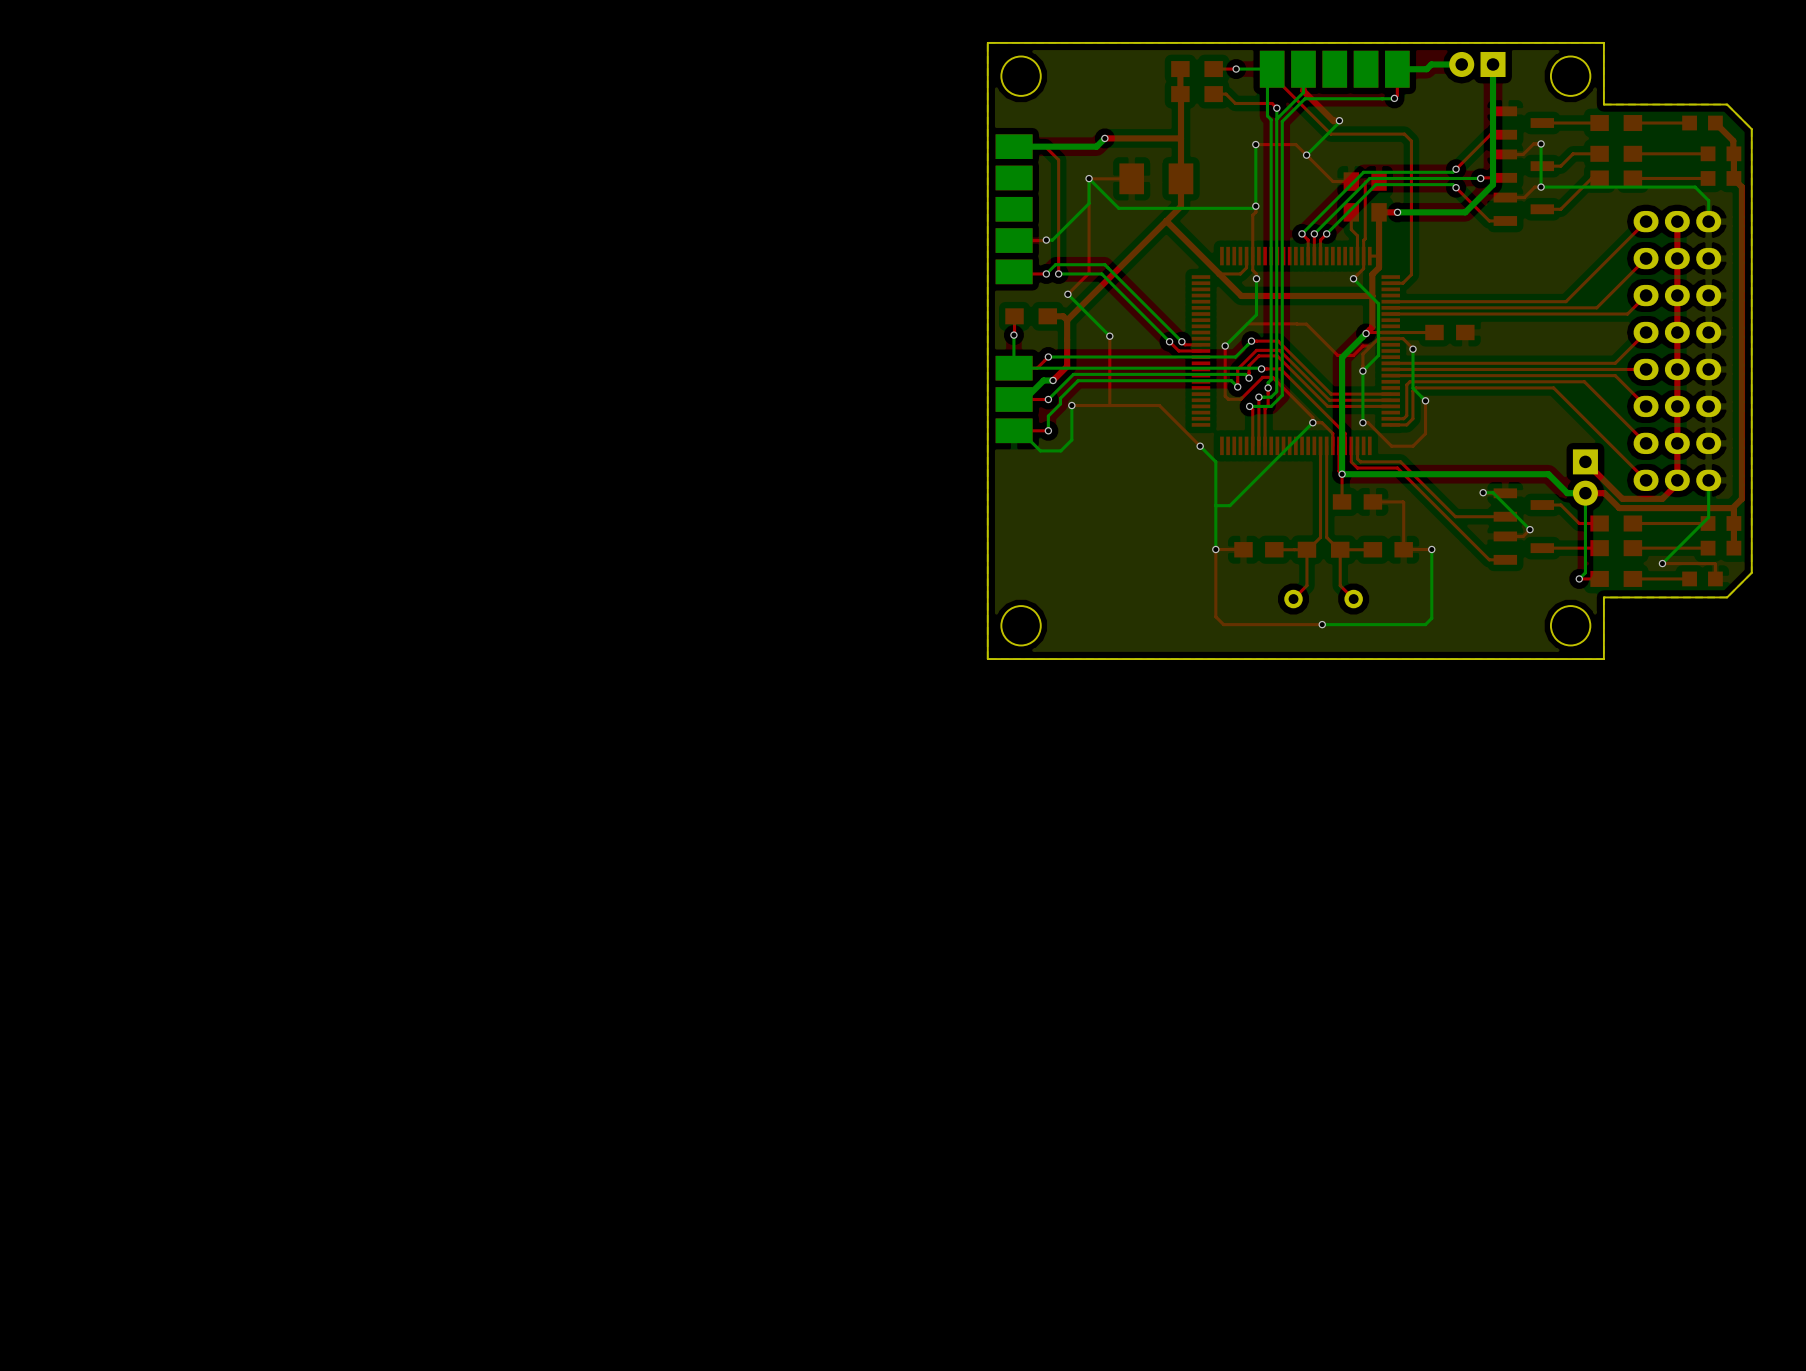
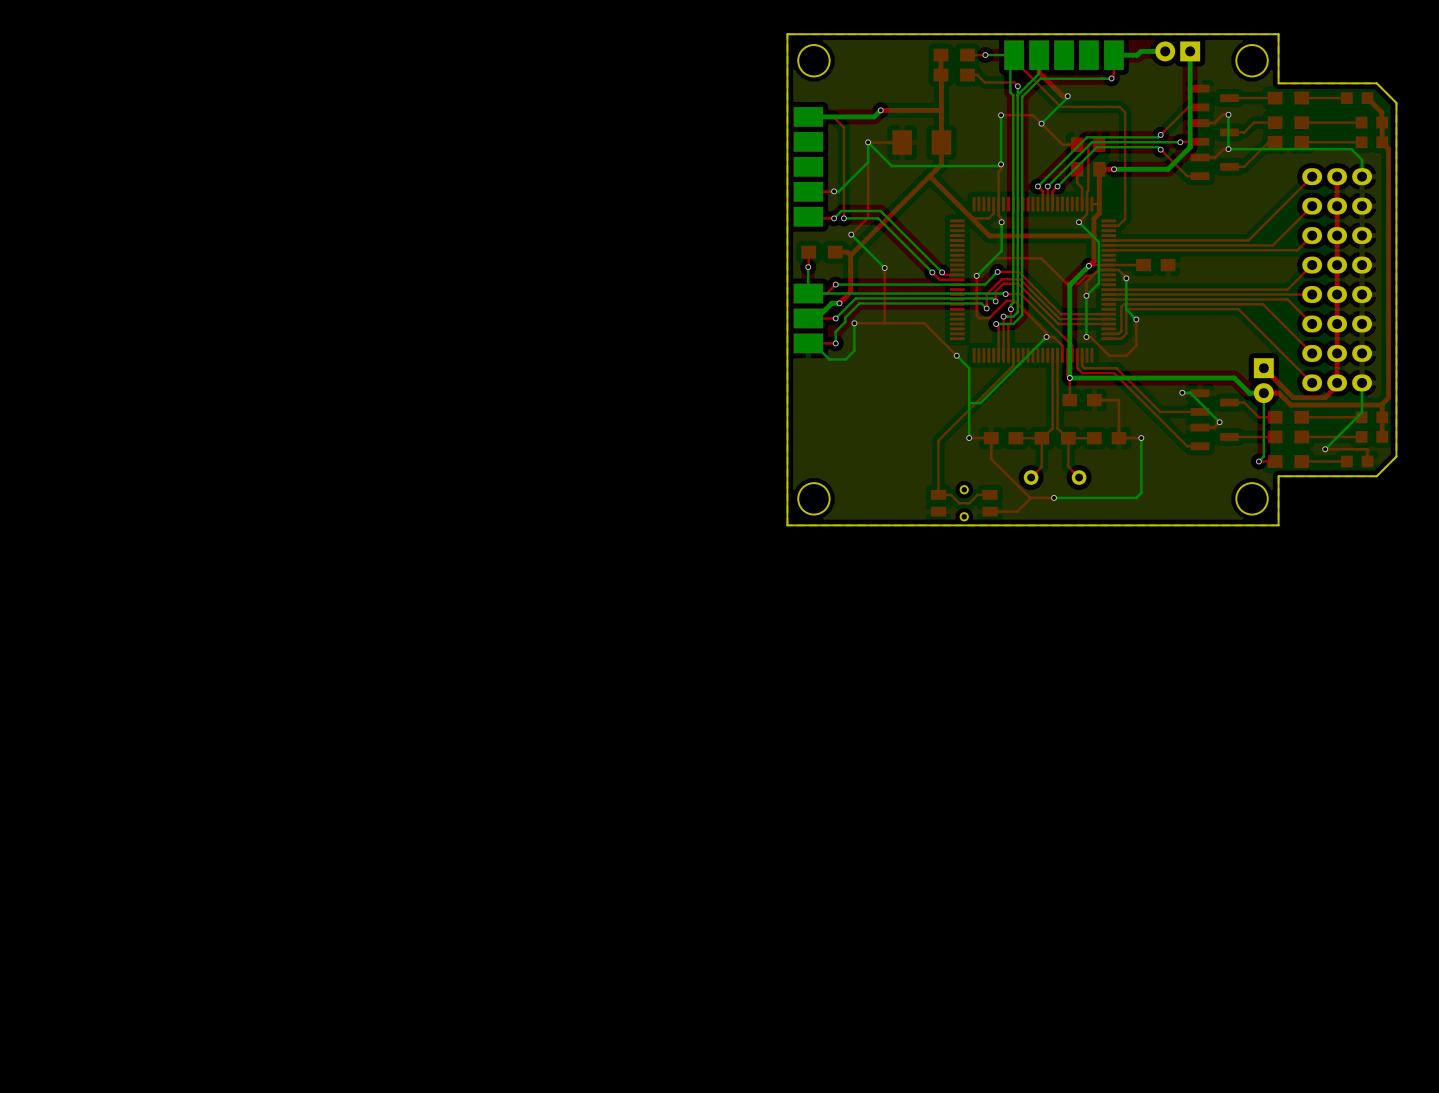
top track: none -> (1013, 355) (1013, 365) (938, 440) (938, 494) (950, 494) (959, 503) (969, 503) (977, 494) (990, 494)
top track: (1215, 549) (1215, 616) (1223, 624) (1292, 624) -> (991, 438) (991, 459) (1030, 497)
top track: none -> (1030, 497) (1017, 511) (990, 511)
part: none -> (964, 503)

